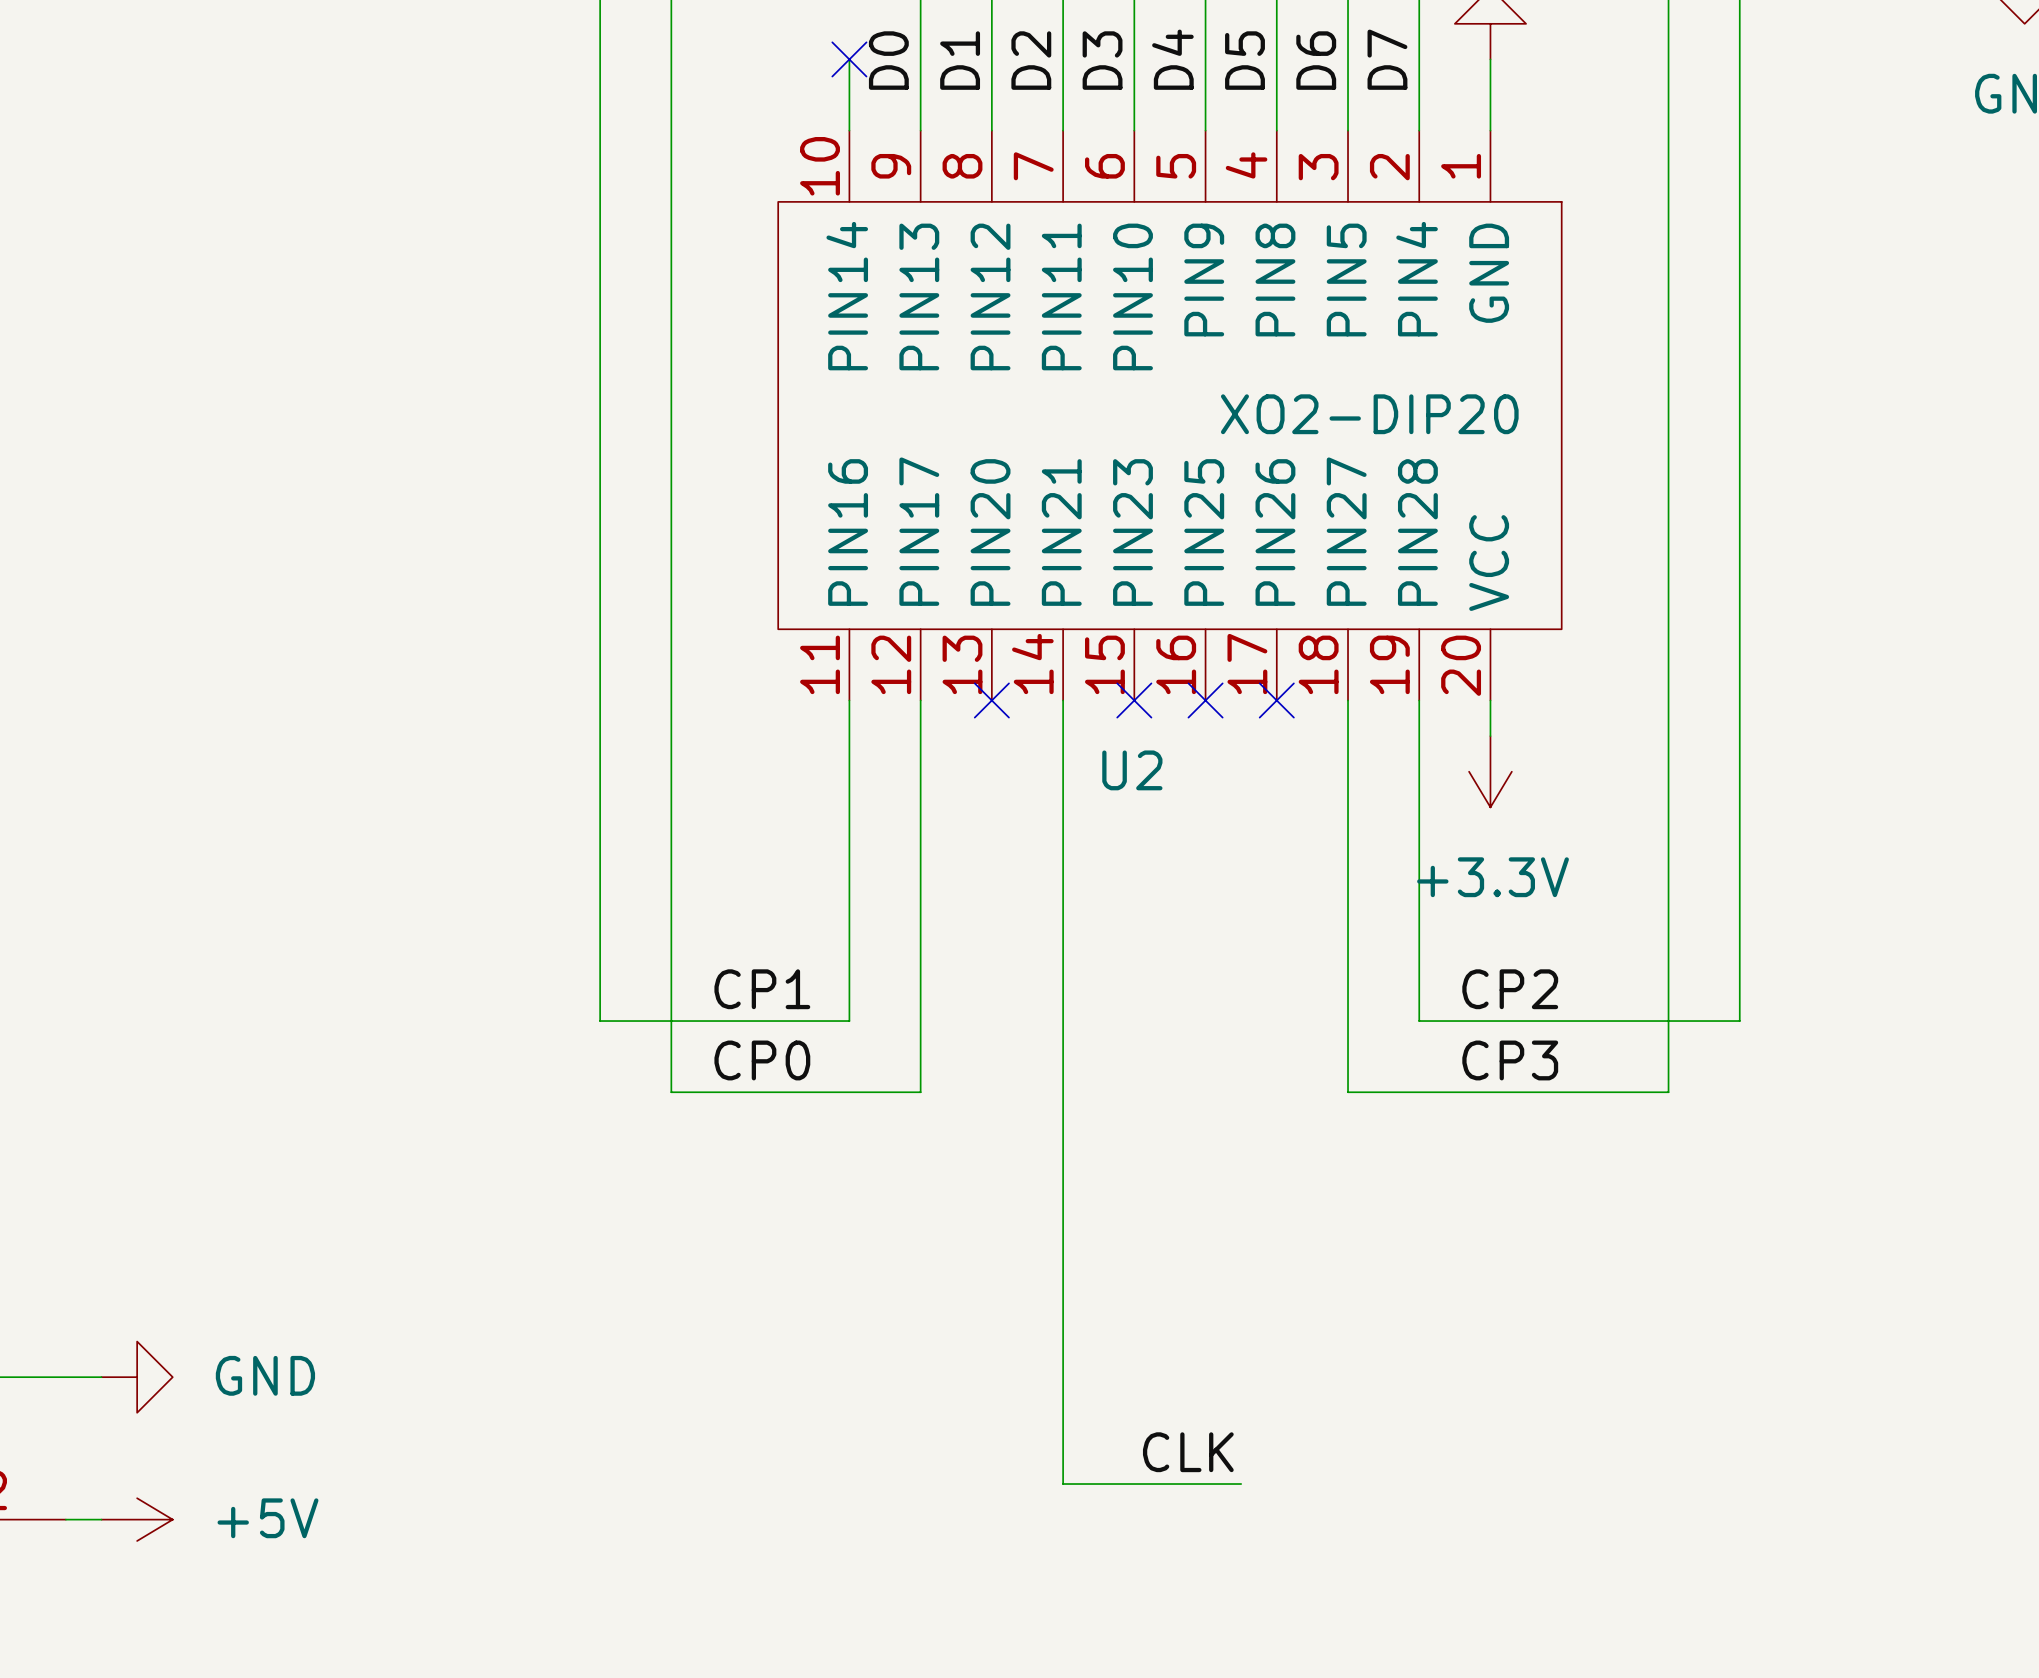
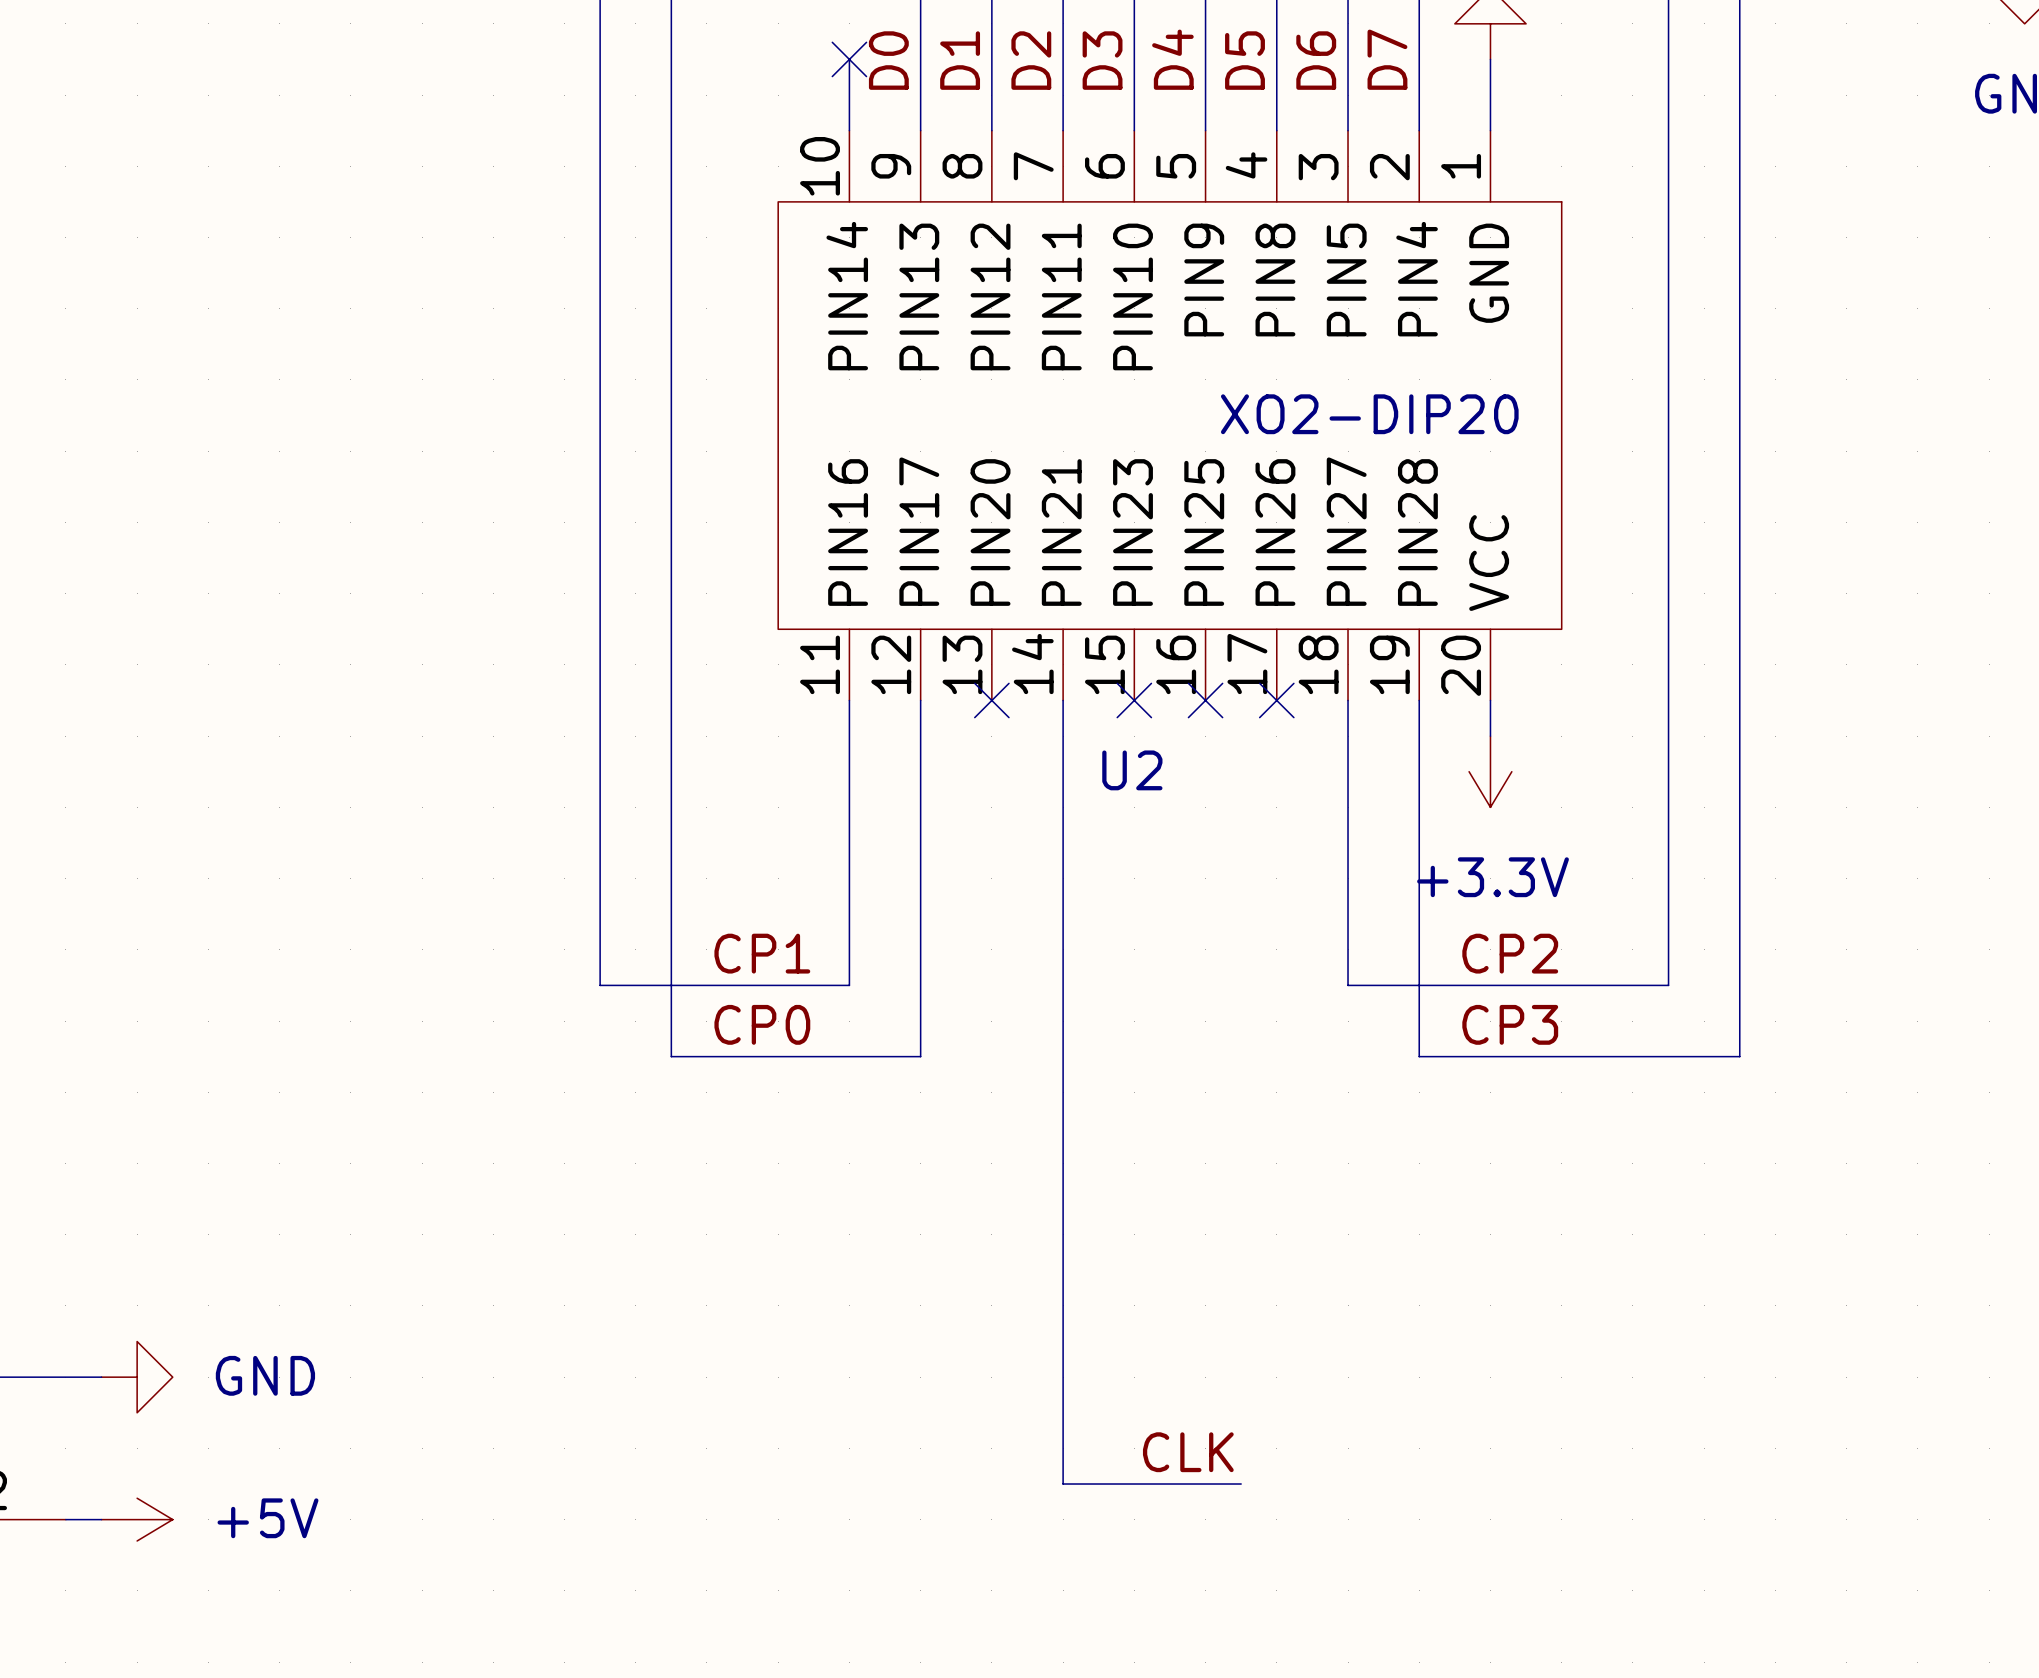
wire: (600, 985) (600, 1021) (849, 1021) (849, 985) -> (600, 985) (849, 985)
wire: (1348, 985) (1348, 1092) (1668, 1092) (1668, 985) -> (1348, 985) (1668, 985)
label position: CP1 (762, 989) -> CP1 (762, 953)
label position: CP2 (1510, 989) -> CP2 (1510, 953)
wire: (1419, 1021) (1739, 1021) -> (1419, 1021) (1419, 1056) (1739, 1056) (1739, 1021)
wire: (671, 1056) (671, 1092) (920, 1092) (920, 1056) -> (671, 1056) (920, 1056)
label position: CP0 (762, 1060) -> CP0 (762, 1024)
label position: CP3 (1510, 1060) -> CP3 (1510, 1024)

